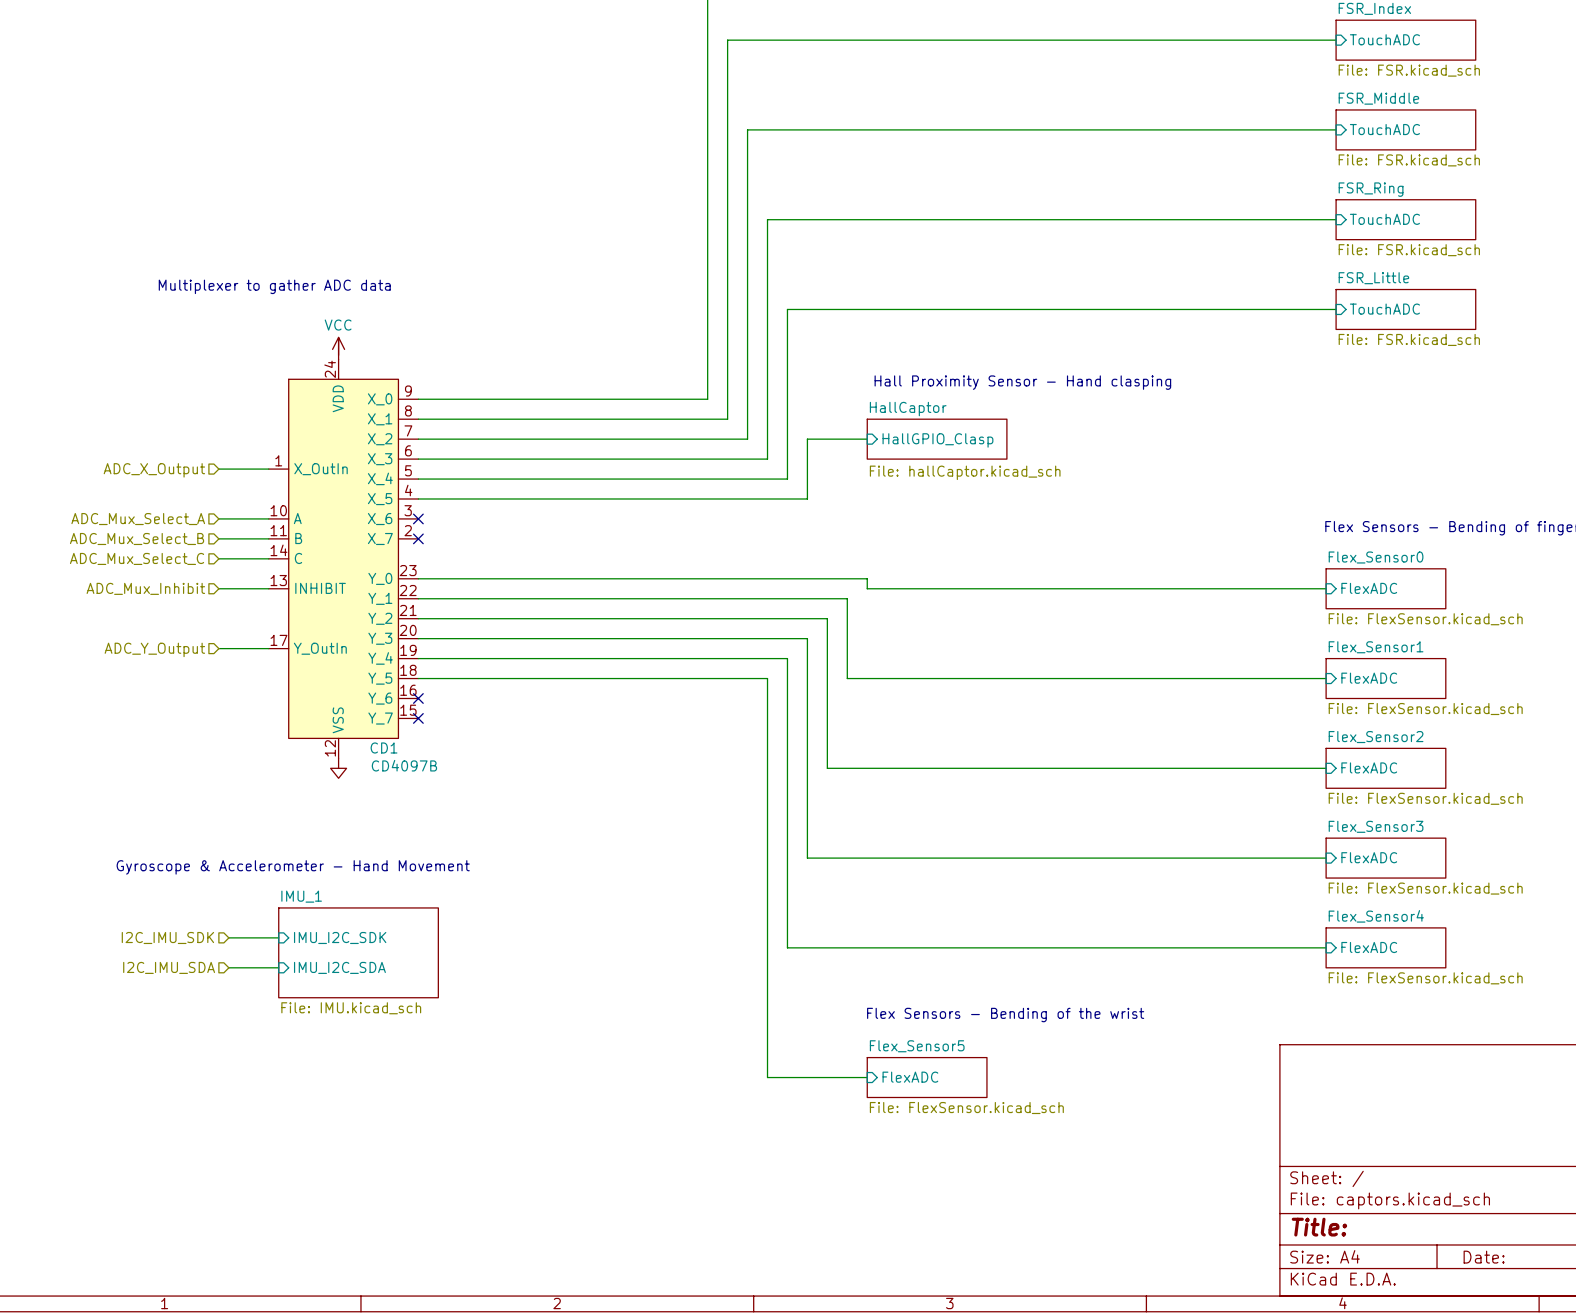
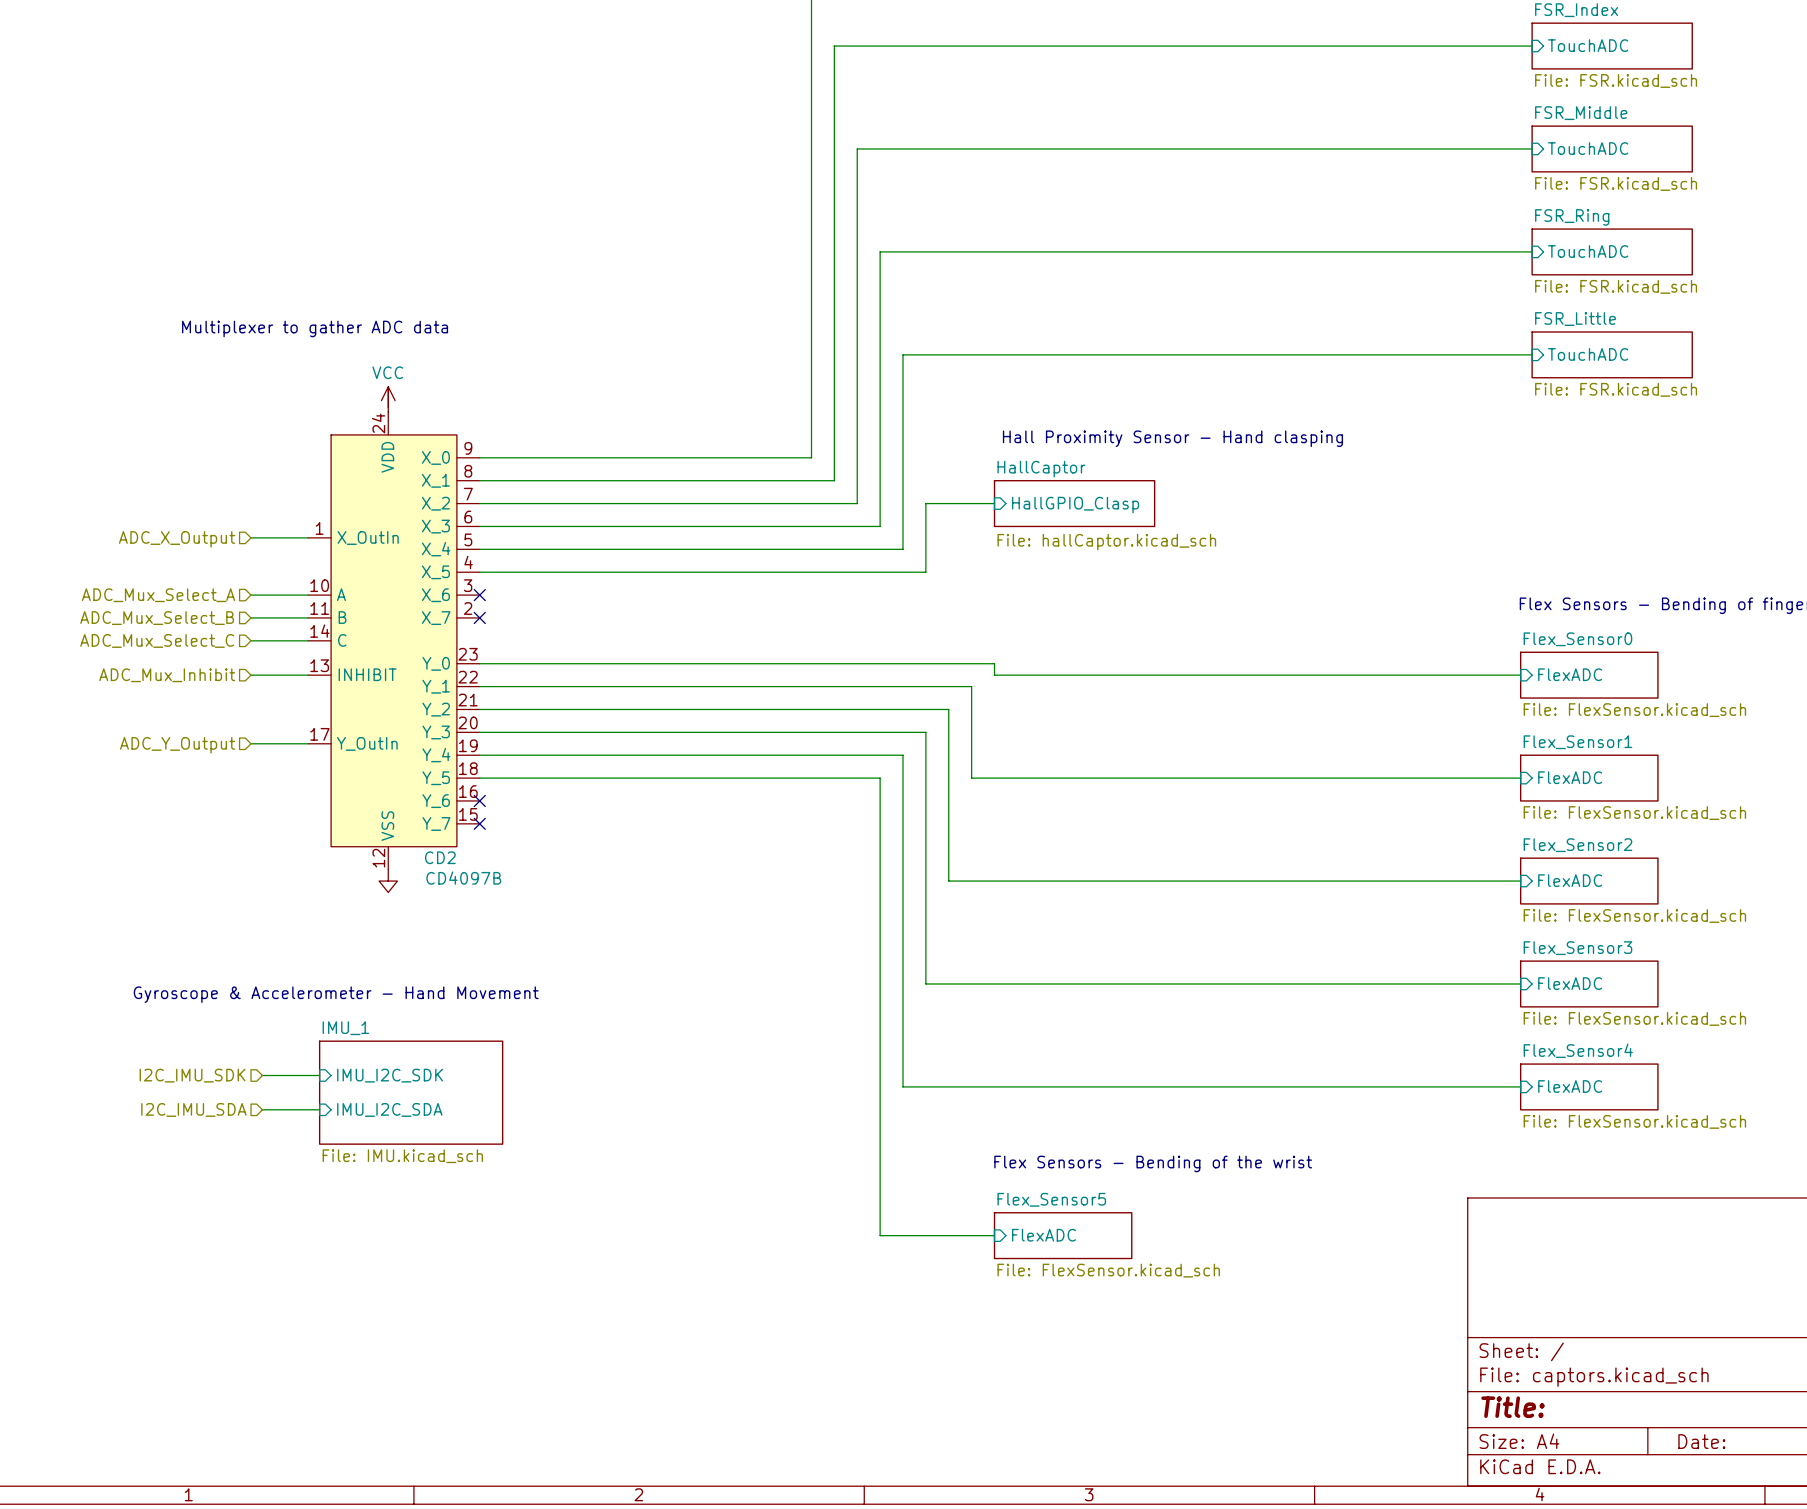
CD1 name: CD1 (384, 747) -> CD2 (440, 857)

